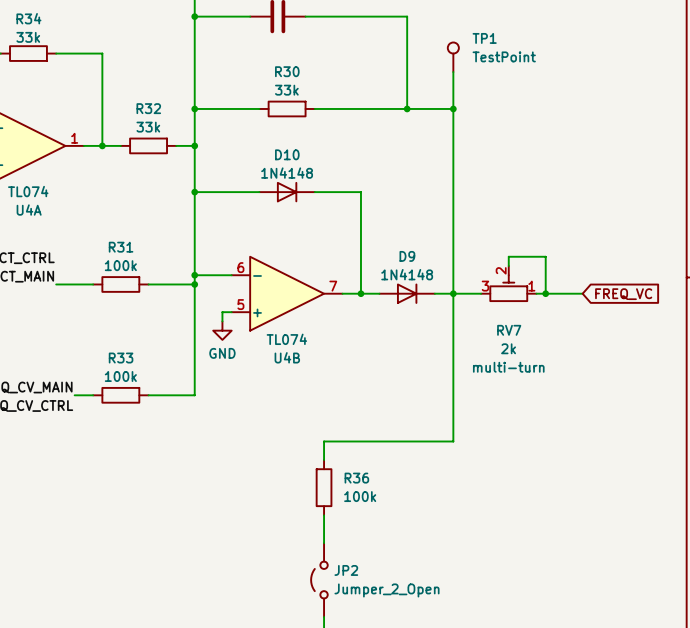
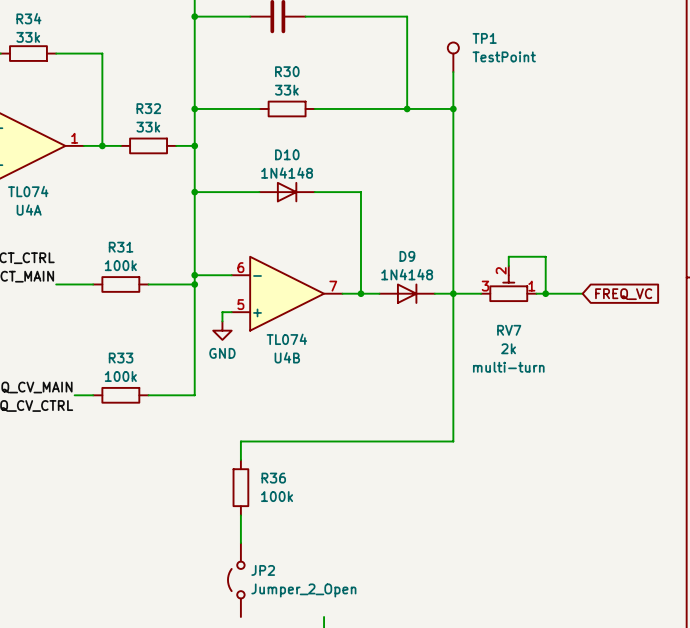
wire: (324, 441) (324, 459) -> (324, 441) (240, 441) (240, 459)
R36 position: (324, 487) -> (240, 487)
wire: (324, 515) (324, 543) -> (240, 515) (240, 543)
JP2 position: (319, 580) -> (236, 580)

